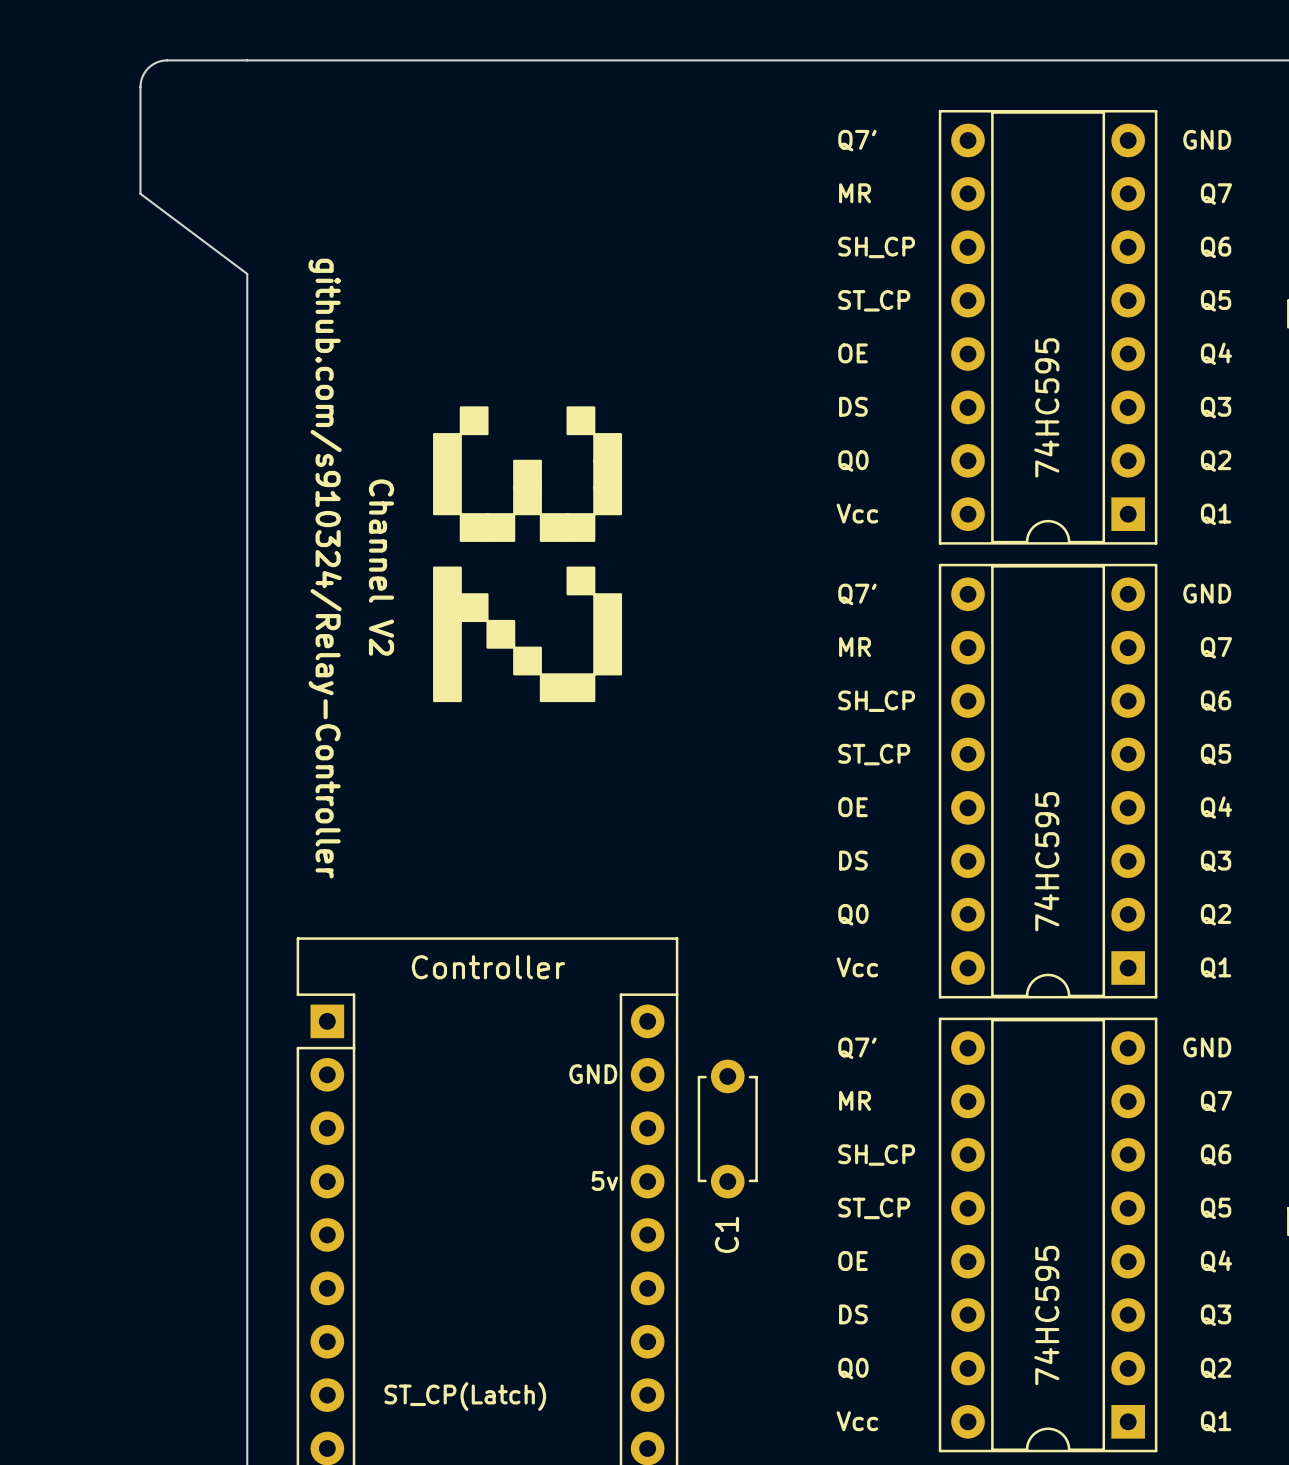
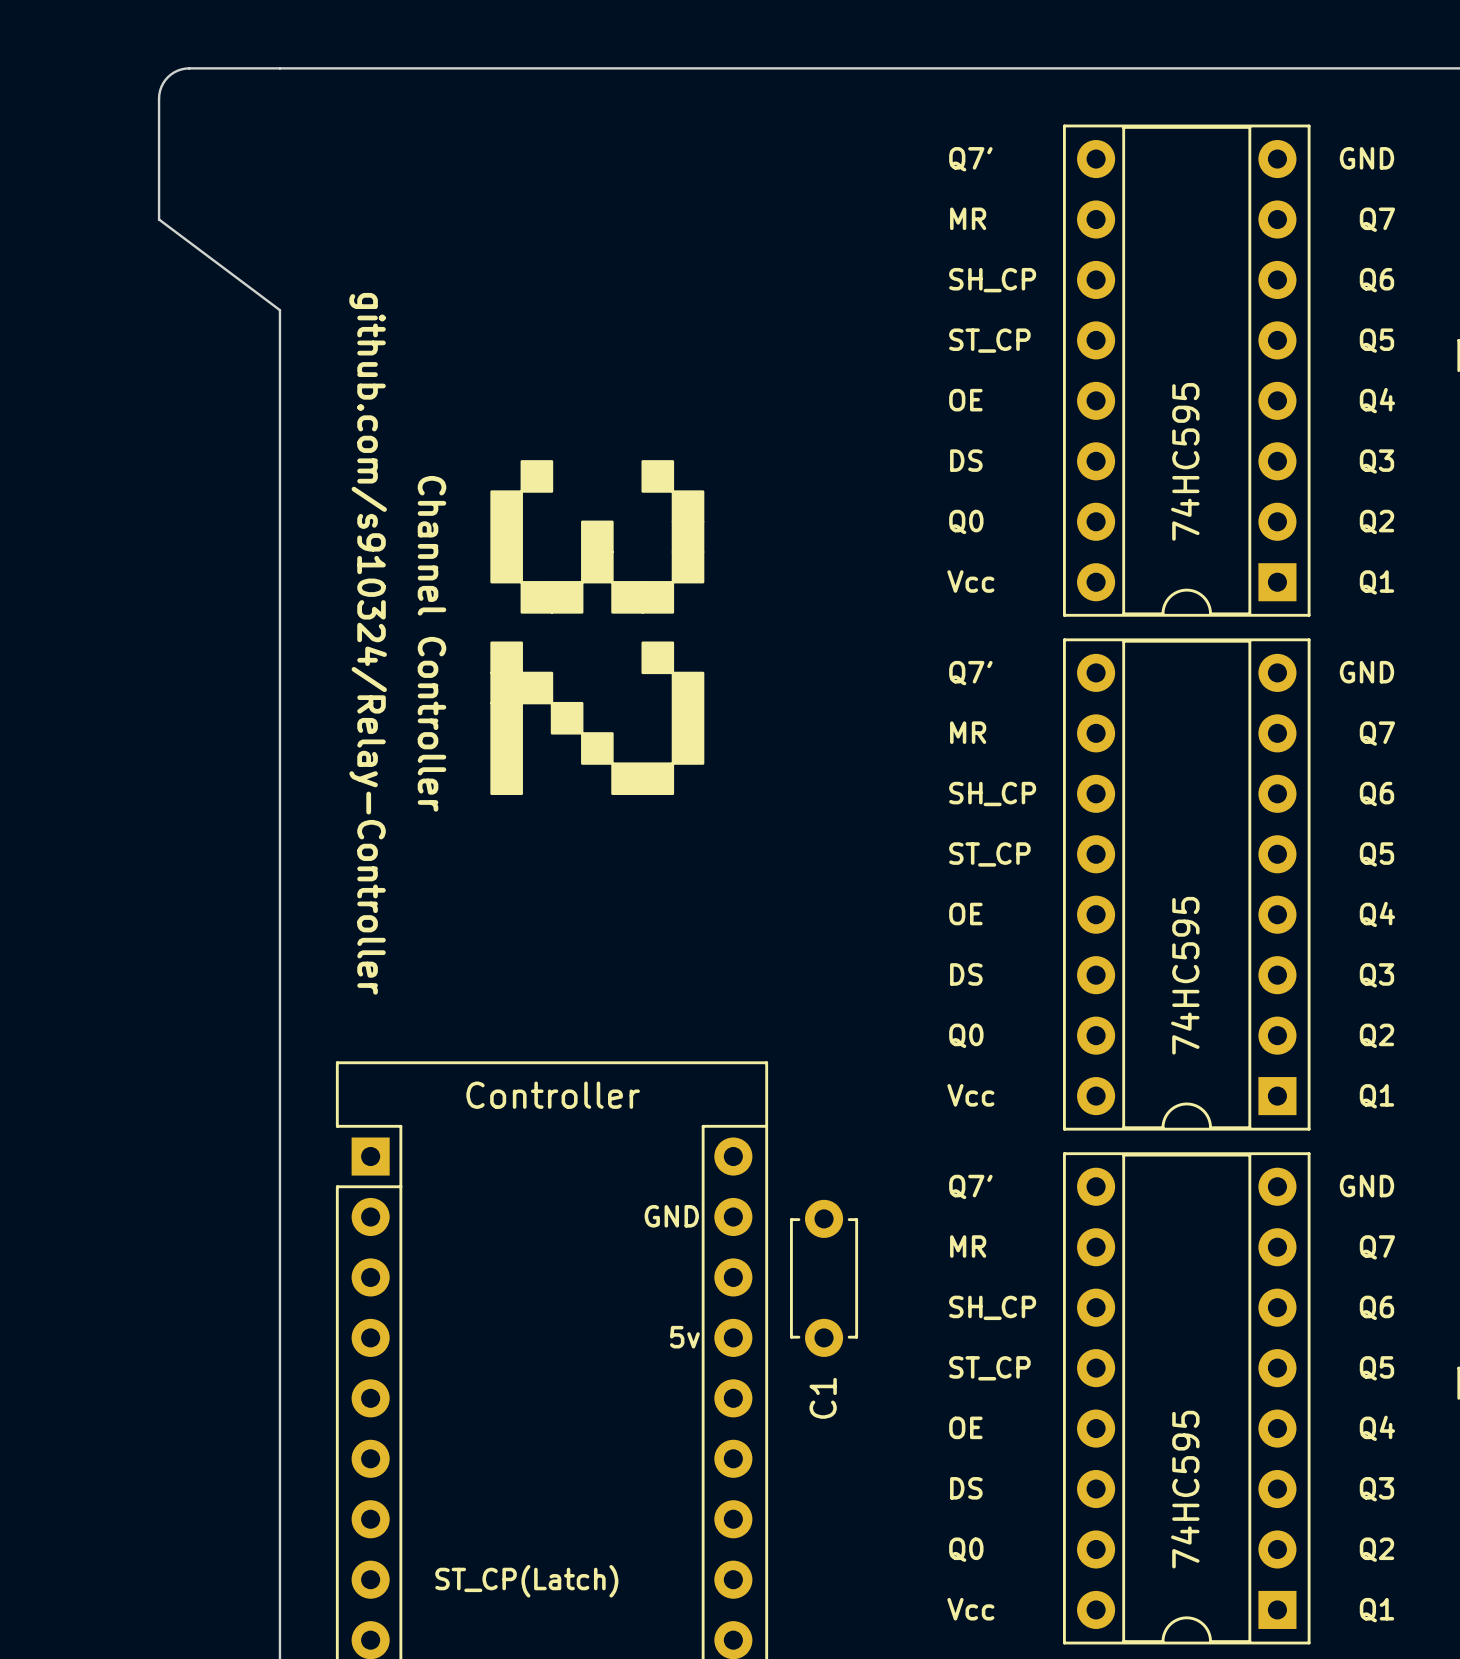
text: Channel V2 (381, 567) -> Channel Controller (431, 643)

